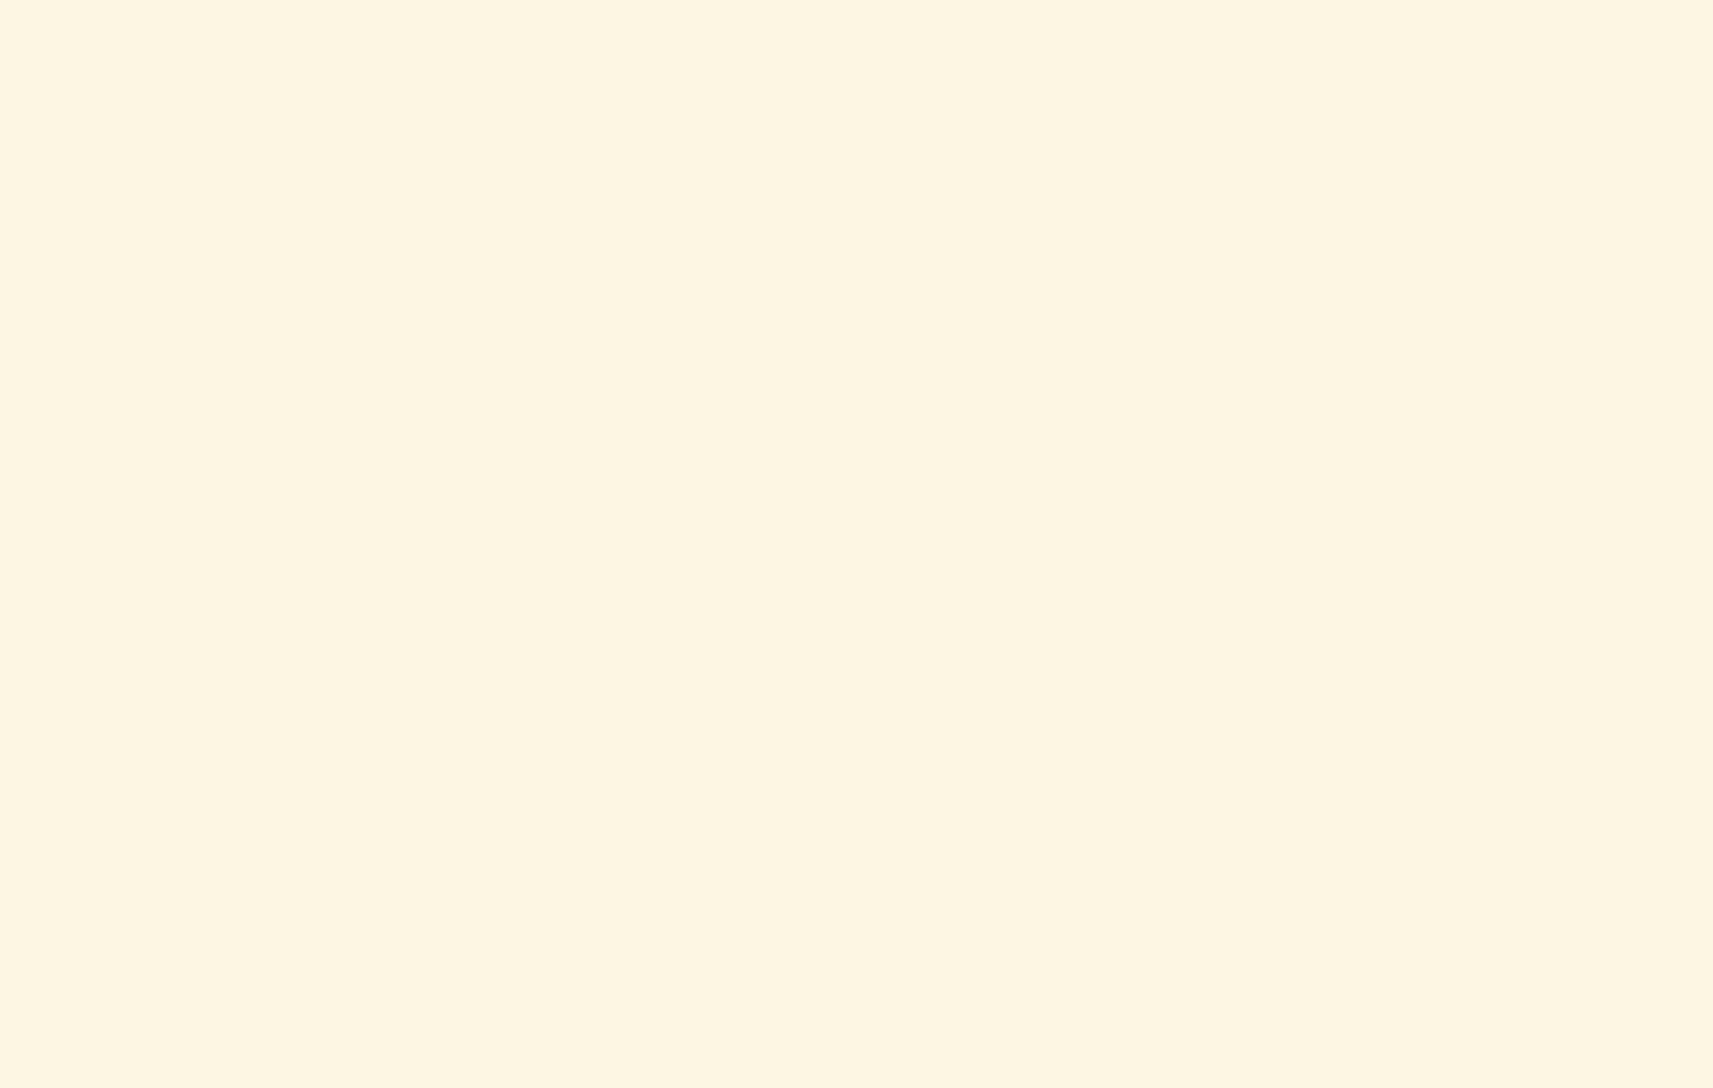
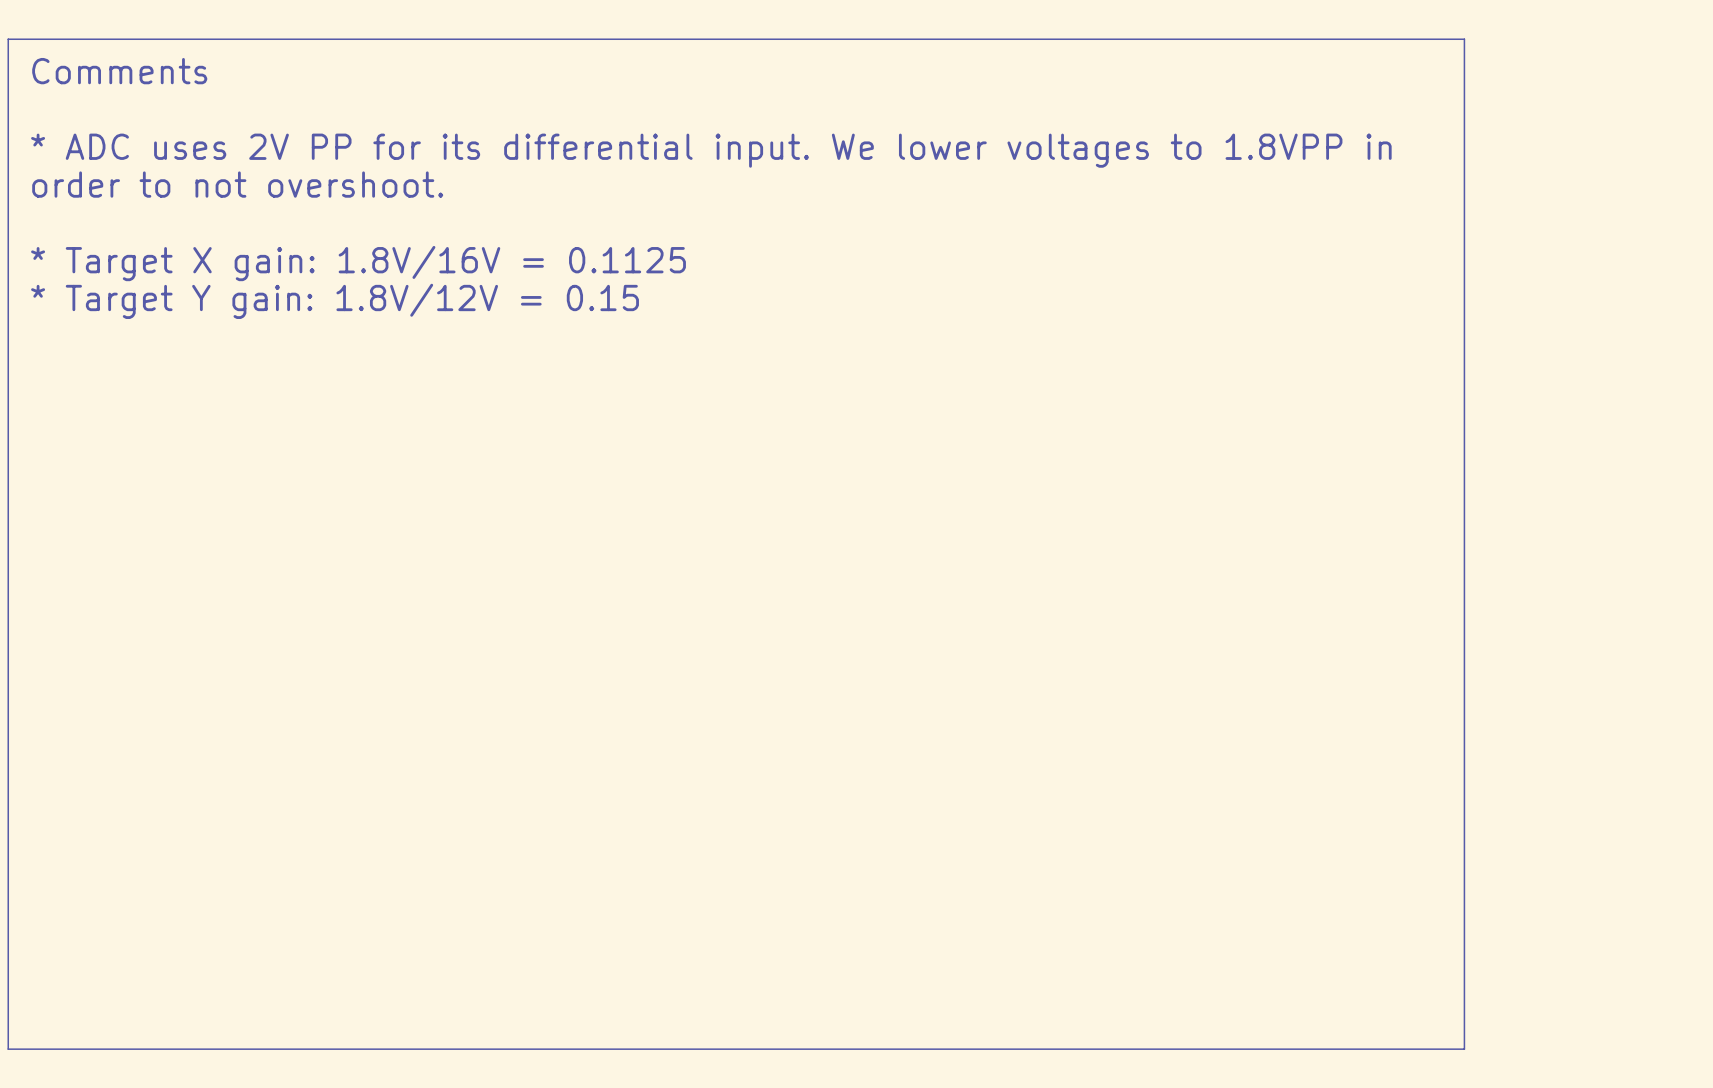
line: none -> (8, 39) (1464, 39) (1464, 1049) (8, 1049) (8, 39)
text: none -> Comments (119, 71)
text: none -> * ADC uses 2V PP for its differential input. We lower voltages to 1.8VPP in (711, 150)
text: none -> order to not overshoot. (237, 184)
text: none -> * Target X gain: 1.8V/16V = 0.1125 (358, 263)
text: none -> * Target Y gain: 1.8V/12V = 0.15 (335, 301)

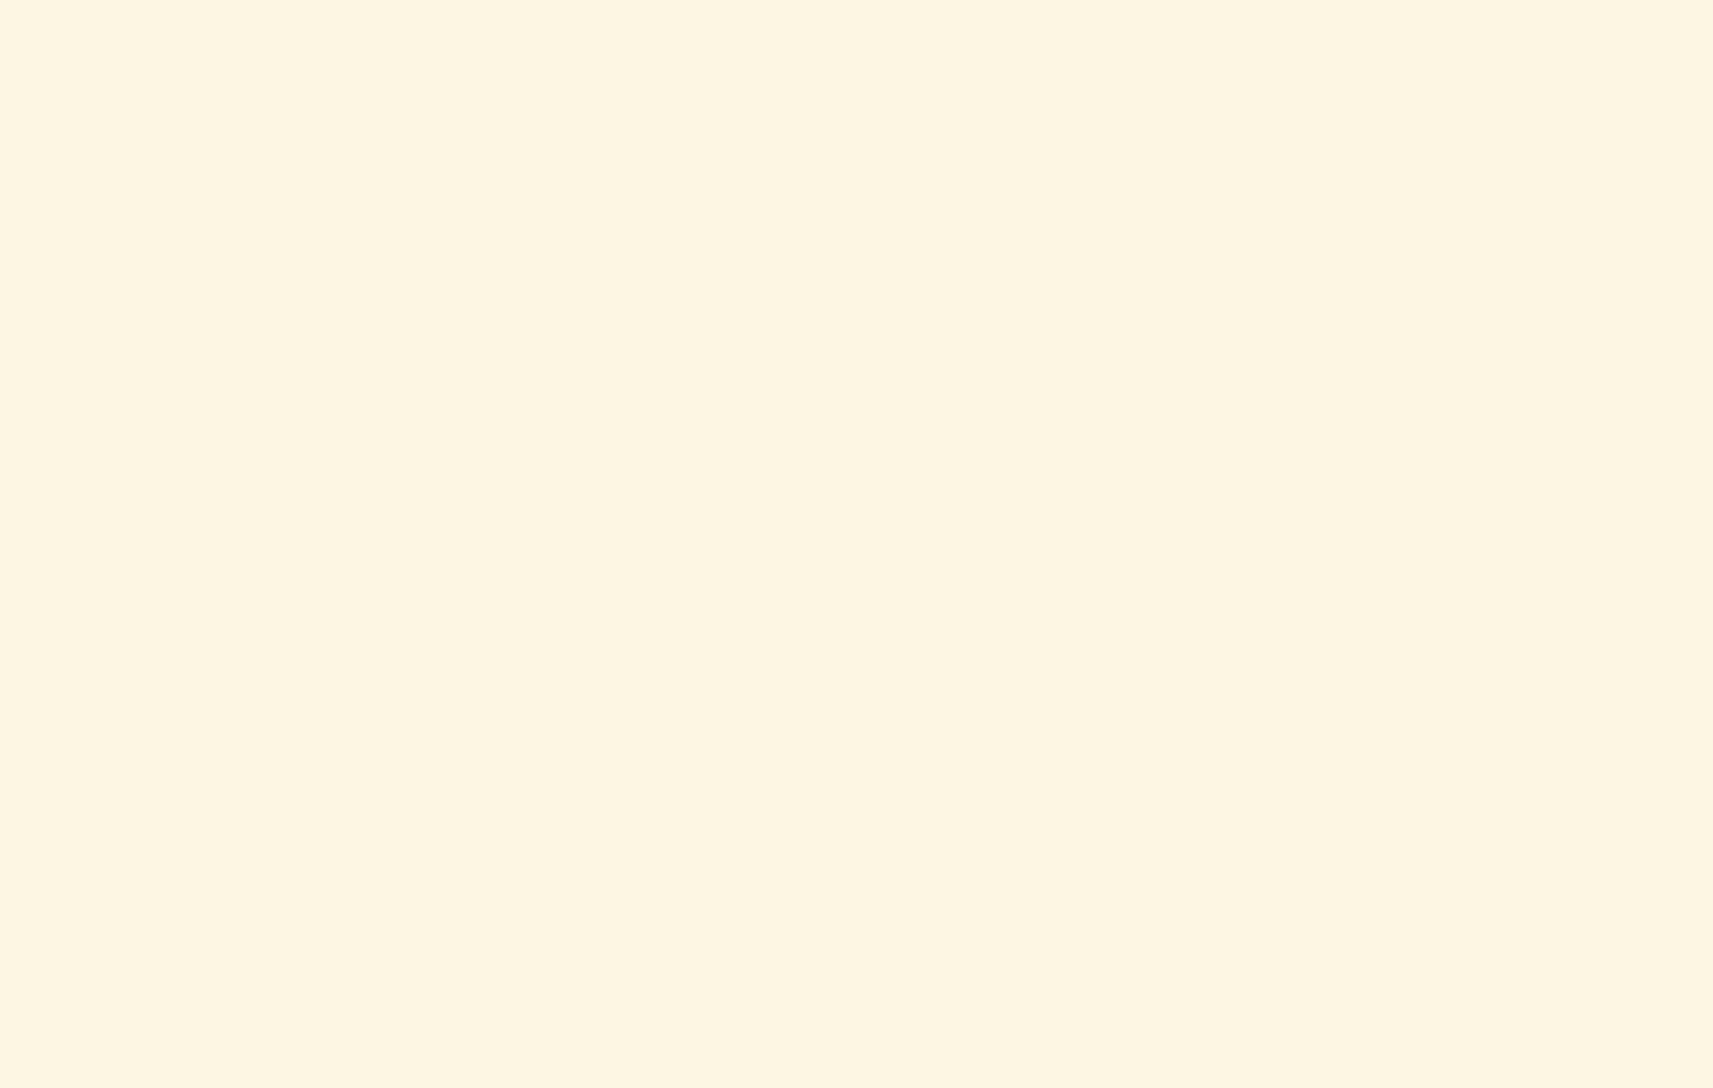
line: (8, 39) (1464, 39) (1464, 1049) (8, 1049) (8, 39) -> none
text: Comments (119, 71) -> none
text: * ADC uses 2V PP for its differential input. We lower voltages to 1.8VPP in (711, 150) -> none
text: order to not overshoot. (237, 184) -> none
text: * Target X gain: 1.8V/16V = 0.1125 (358, 263) -> none
text: * Target Y gain: 1.8V/12V = 0.15 (335, 301) -> none

